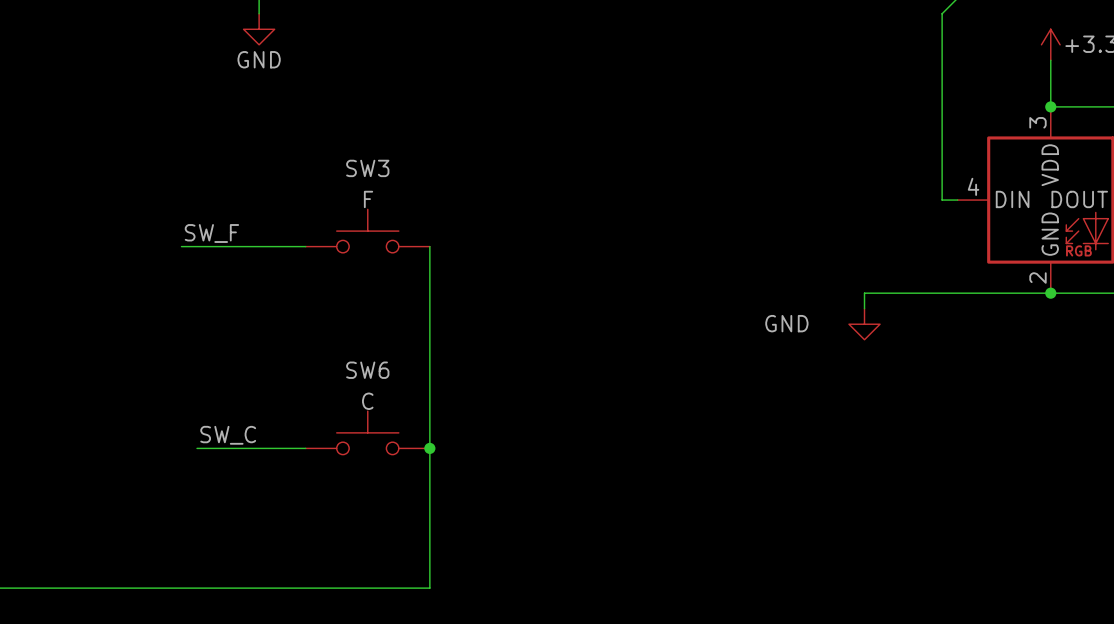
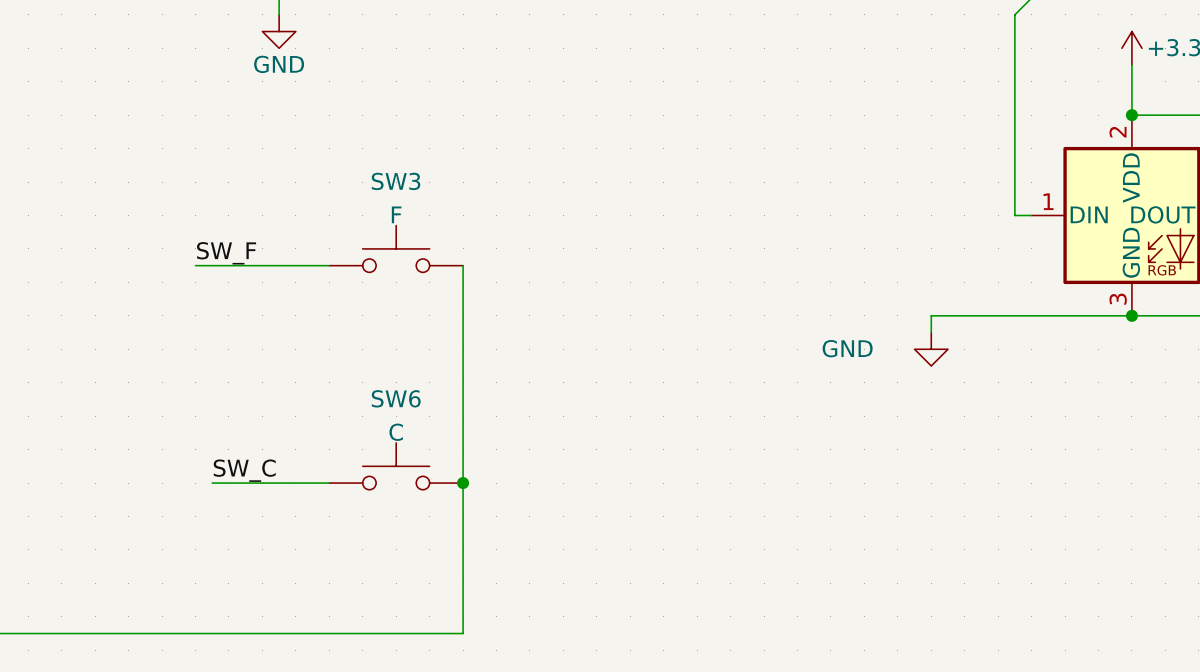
part pin number: 3 (1037, 122) -> 2 (1118, 132)
part pin number: 4 (973, 186) -> 1 (1048, 201)
part pin number: 2 (1037, 278) -> 3 (1118, 299)

